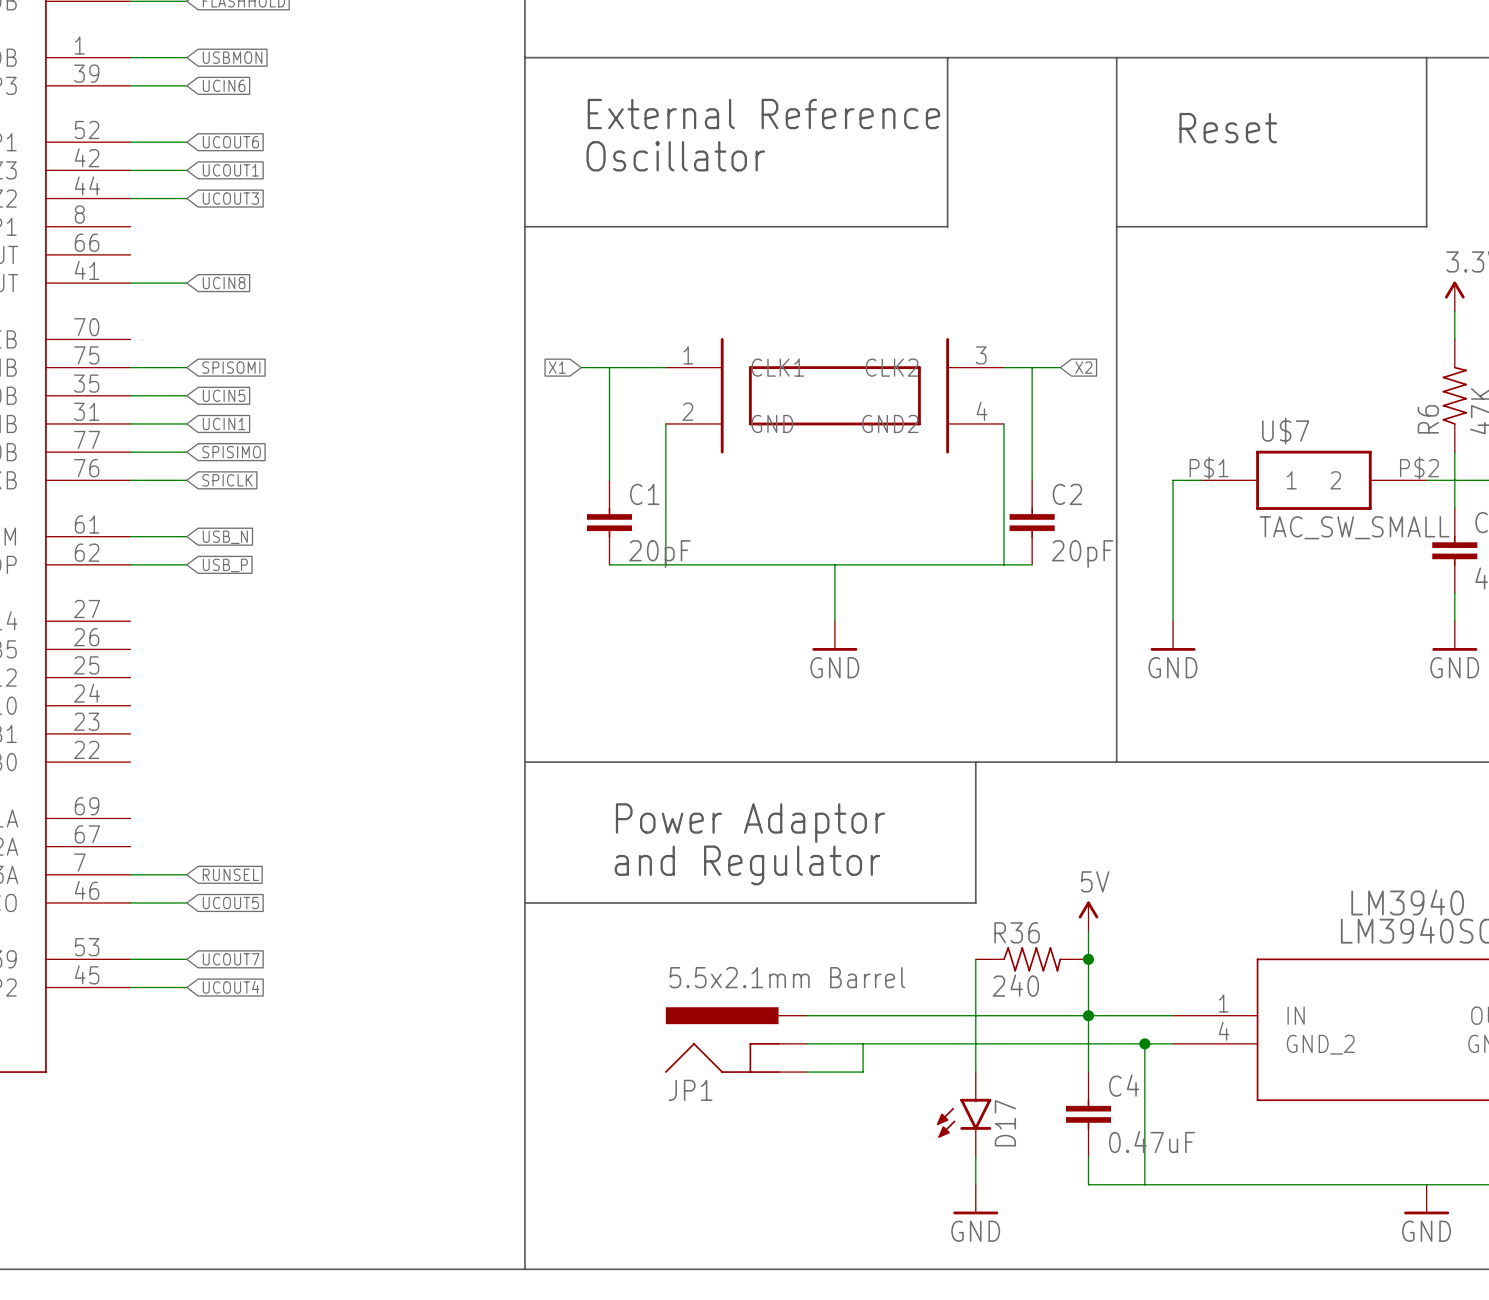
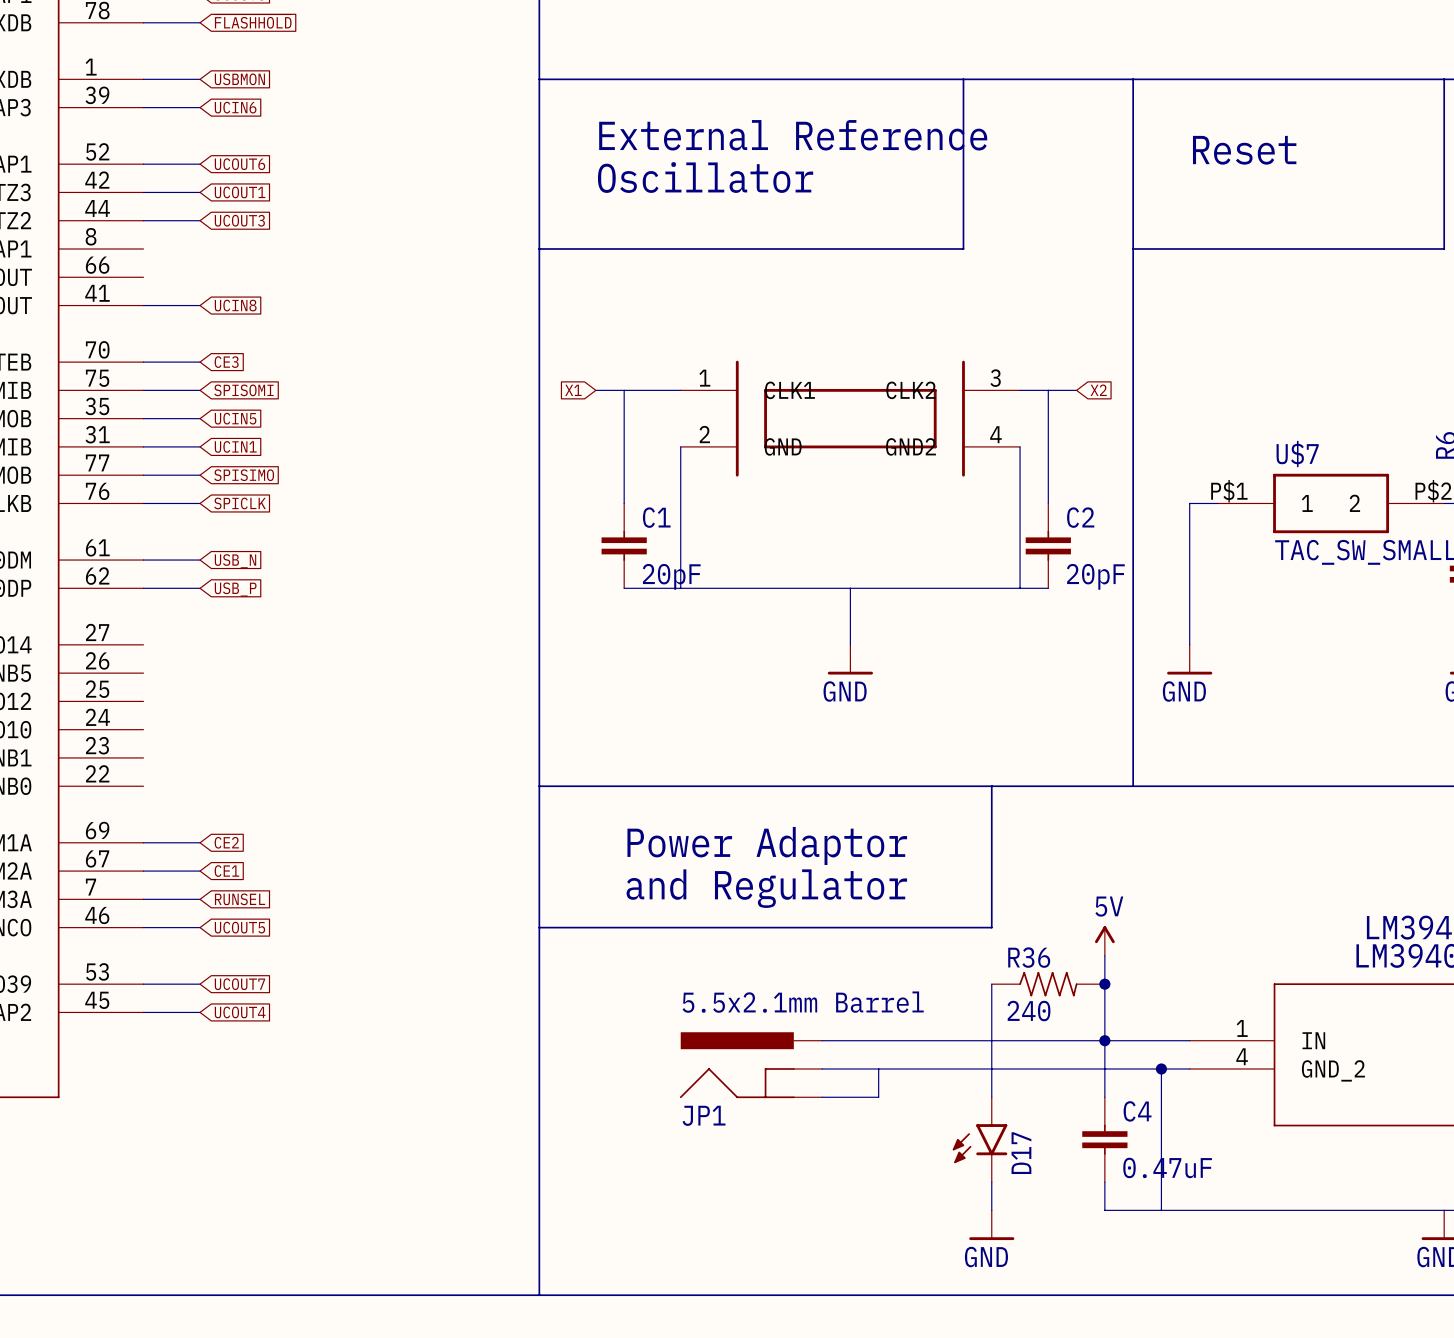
wire: none -> (143, 362) (200, 362)
global label: none -> CE3 (226, 362)
wire: none -> (143, 842) (200, 842)
global label: none -> CE2 (226, 842)
wire: none -> (143, 871) (200, 871)
global label: none -> CE1 (226, 871)

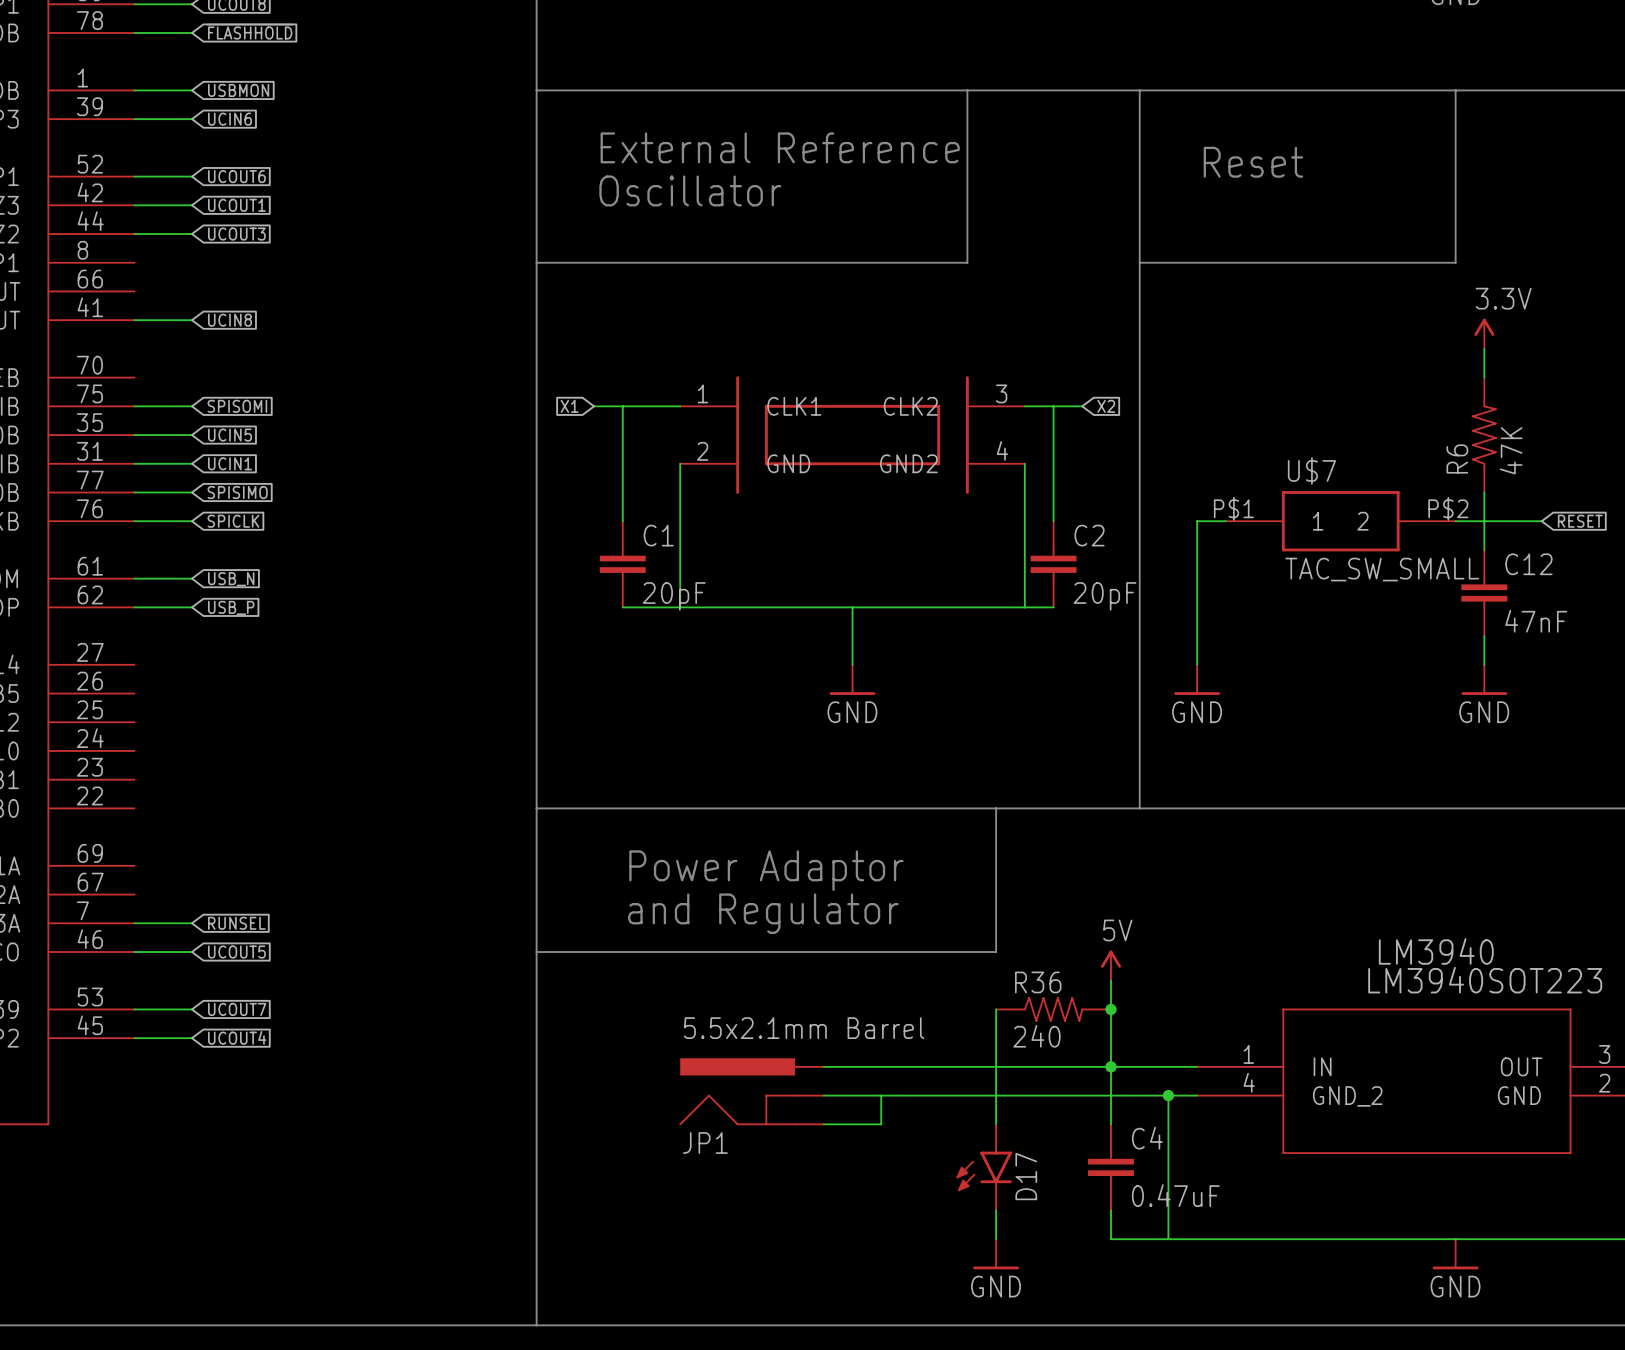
wire: (143, 362) (200, 362) -> none
global label: CE3 (226, 362) -> none
wire: (143, 842) (200, 842) -> none
global label: CE2 (226, 842) -> none
wire: (143, 871) (200, 871) -> none
global label: CE1 (226, 871) -> none

